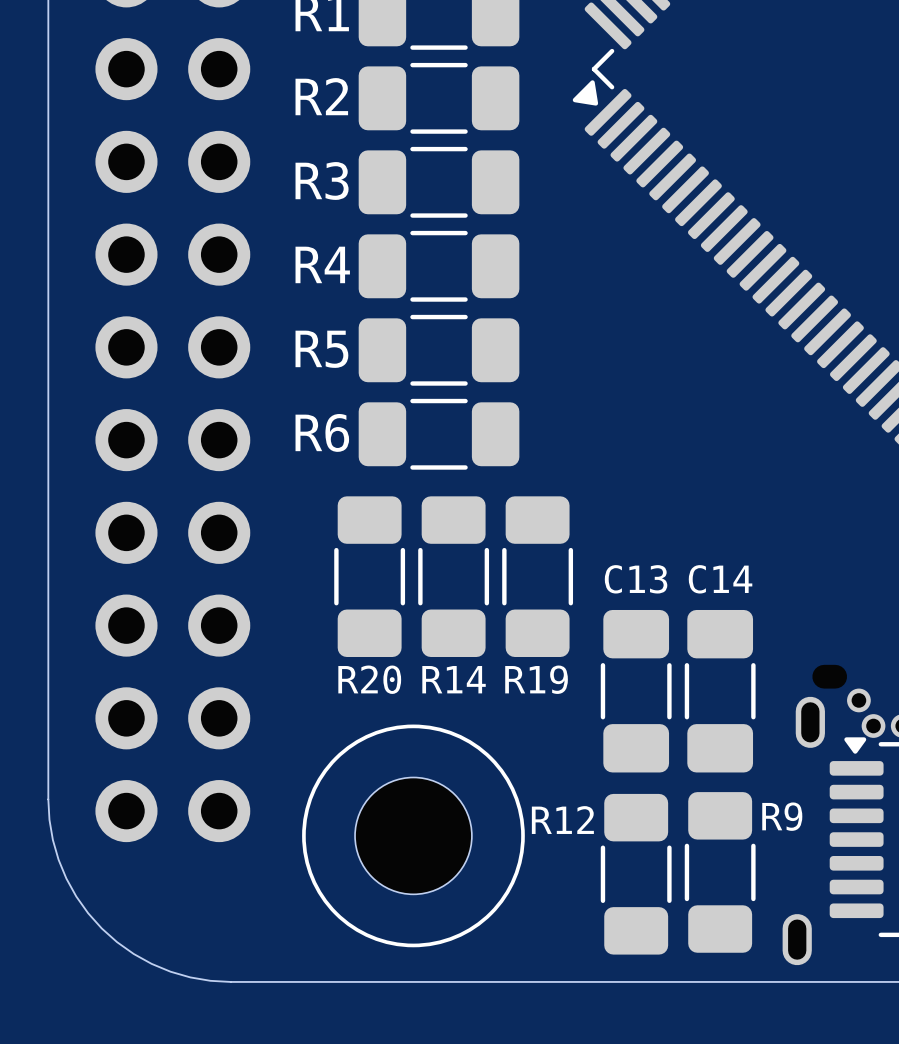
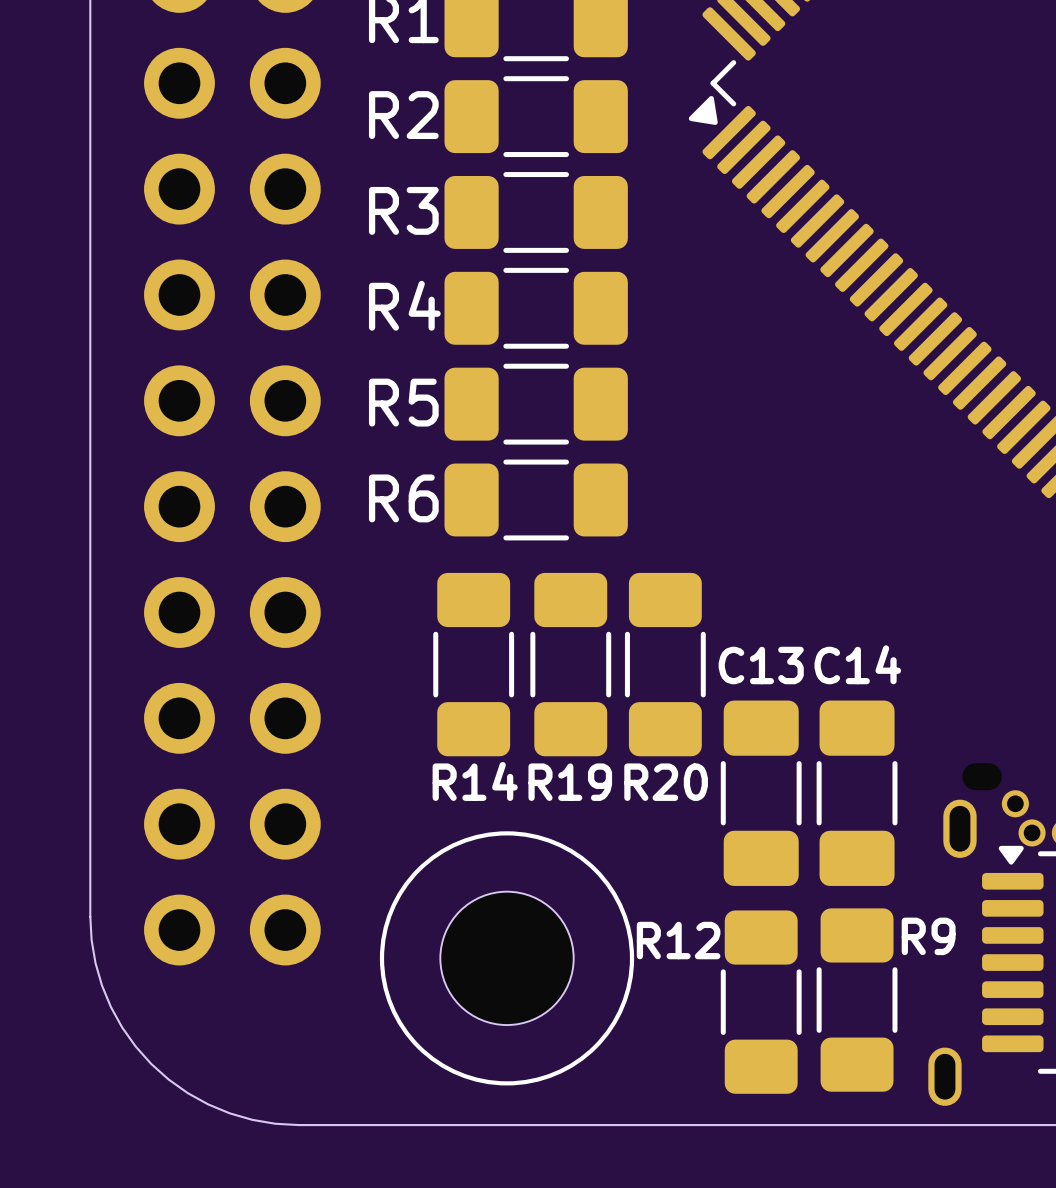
R20 position: (369, 576) -> (665, 664)
R14 position: (453, 576) -> (473, 664)
R19 position: (537, 576) -> (570, 664)

